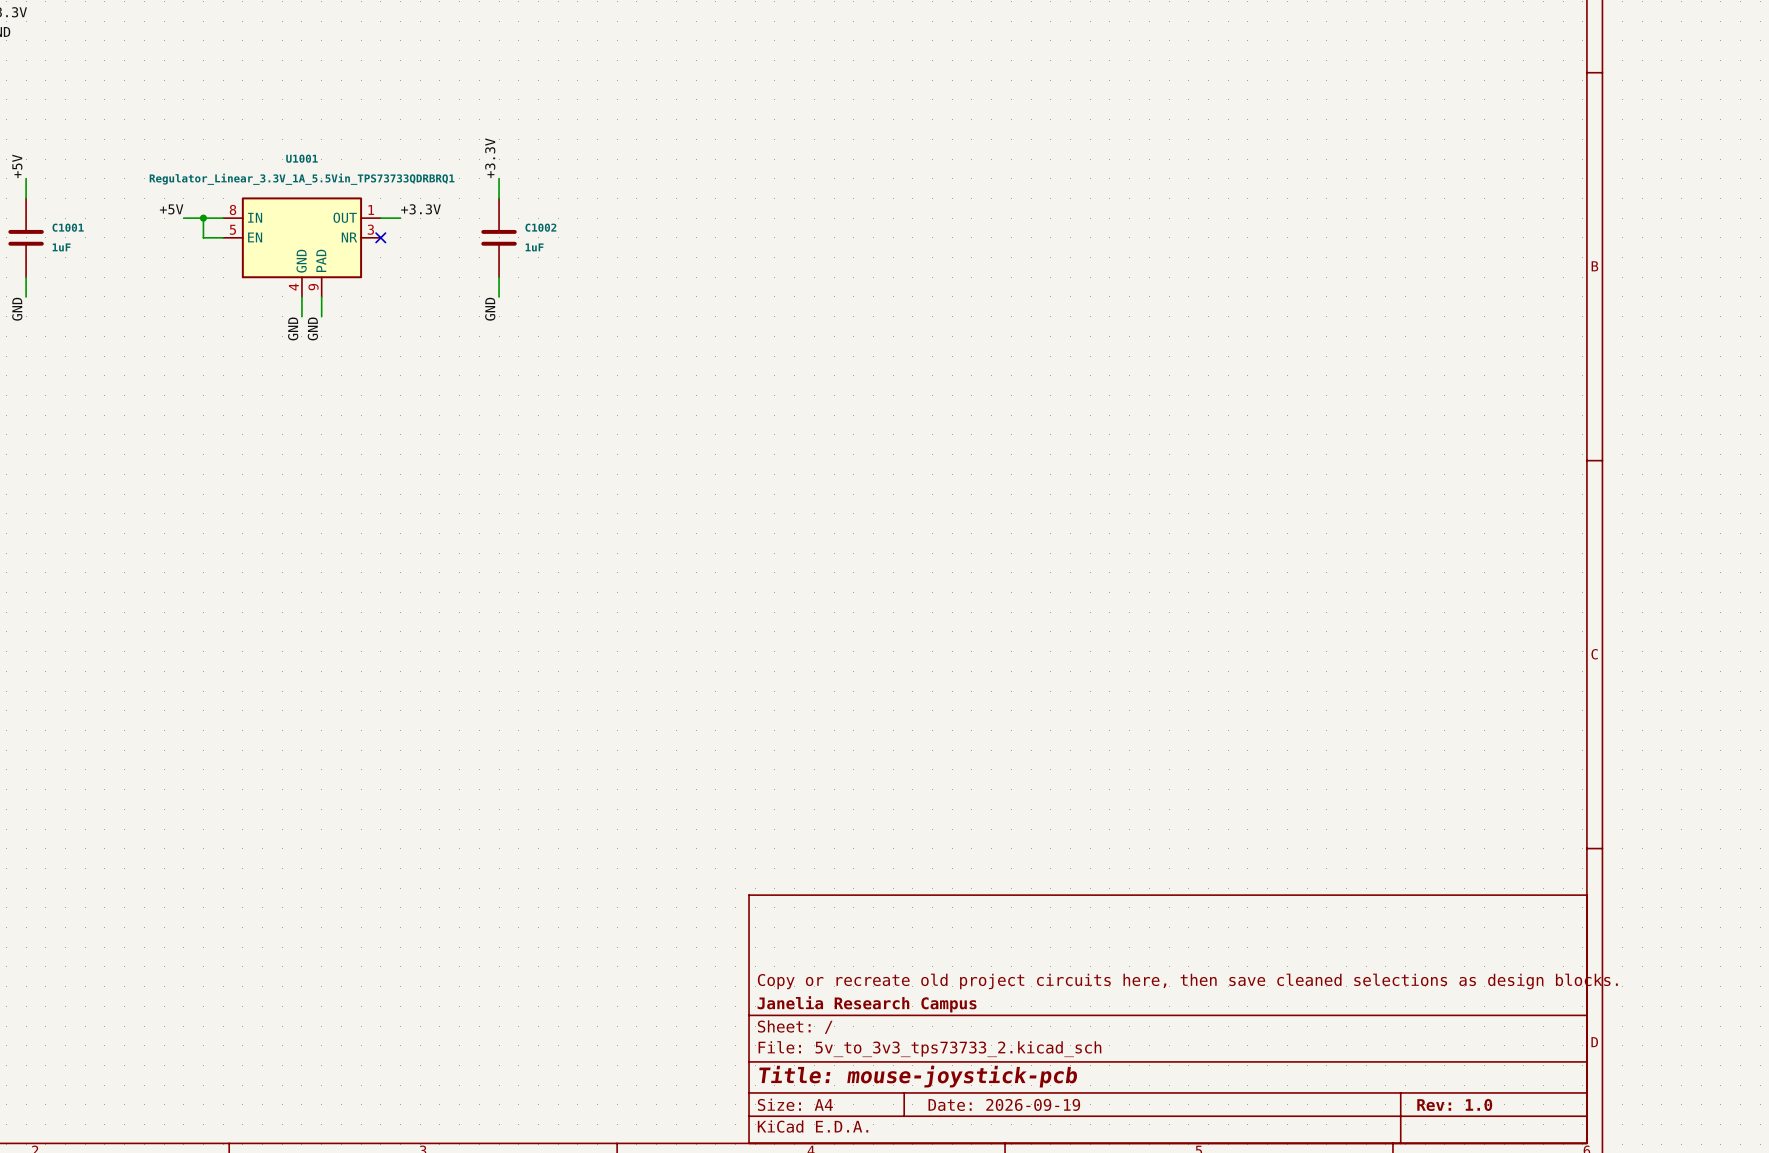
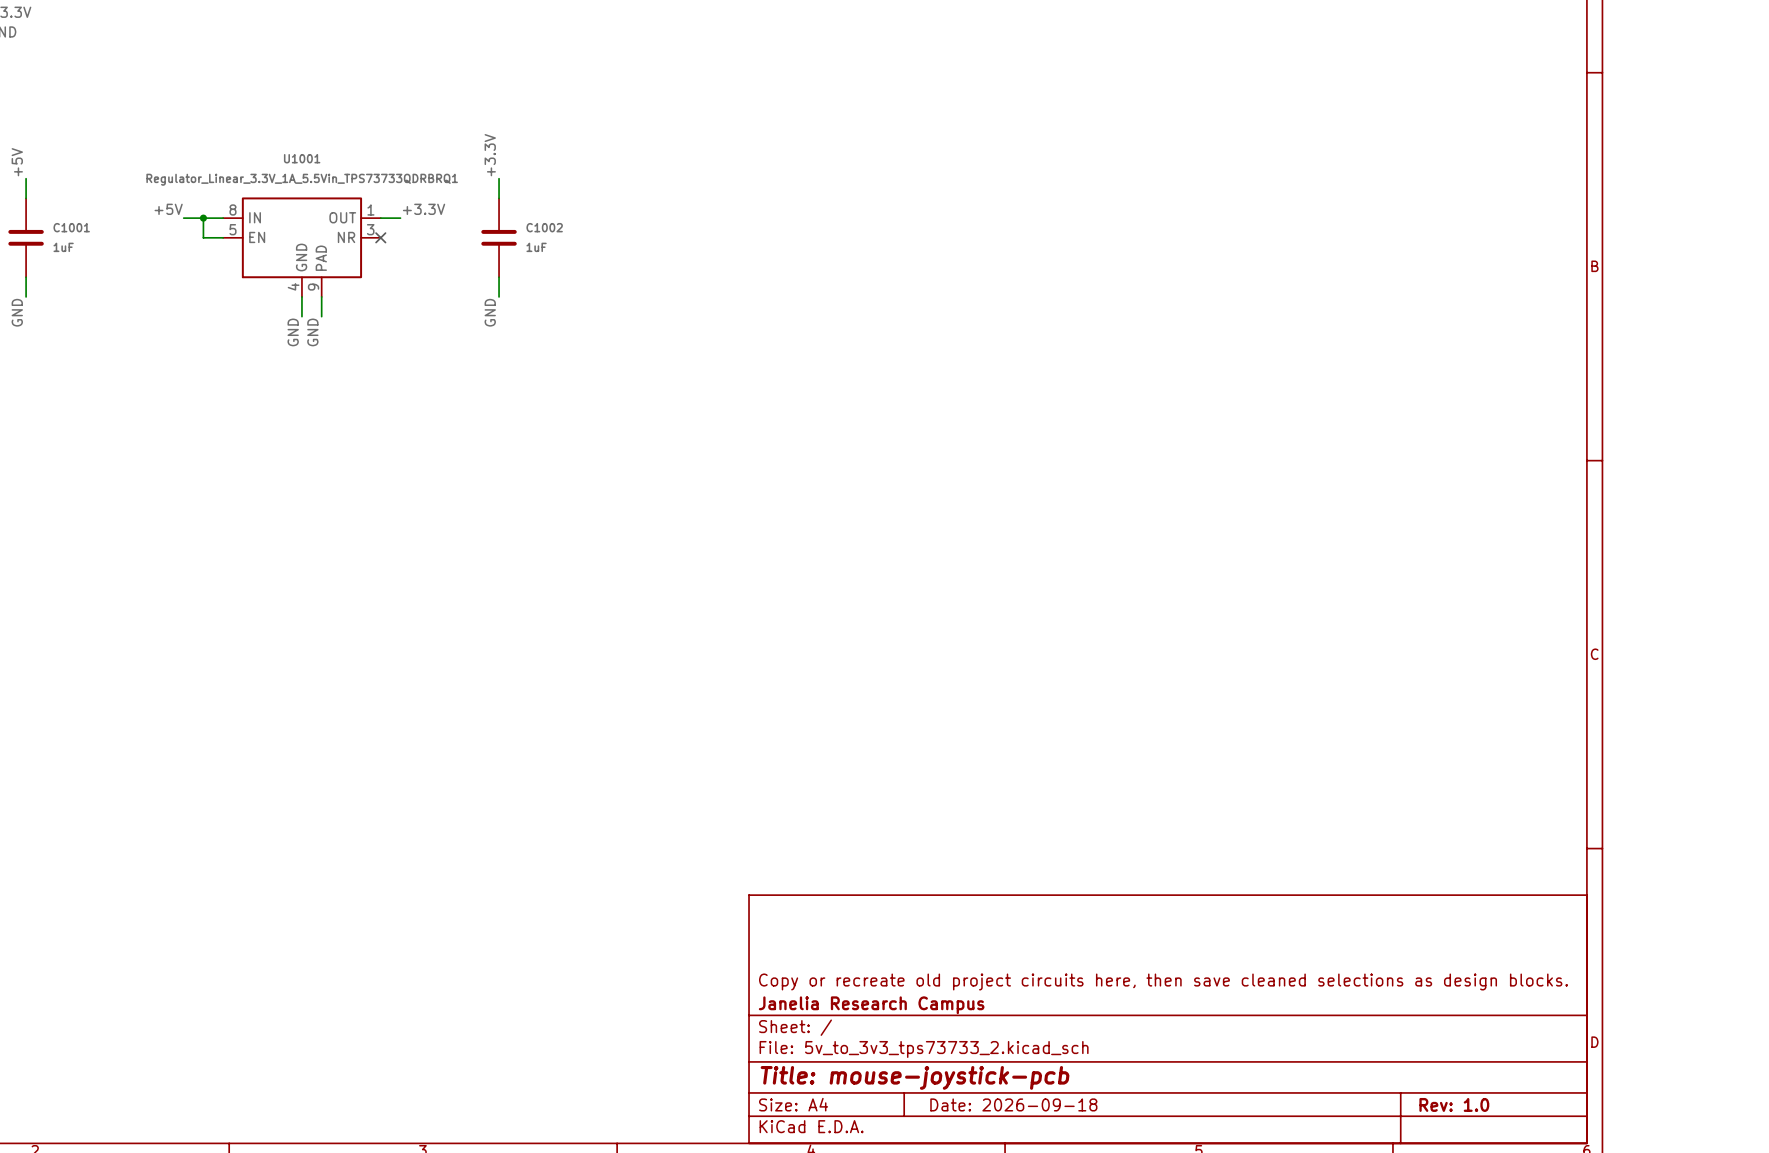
title block: Date: 2026-09-19 (1004, 1104) -> Date: 2026-09-18 (1013, 1104)

